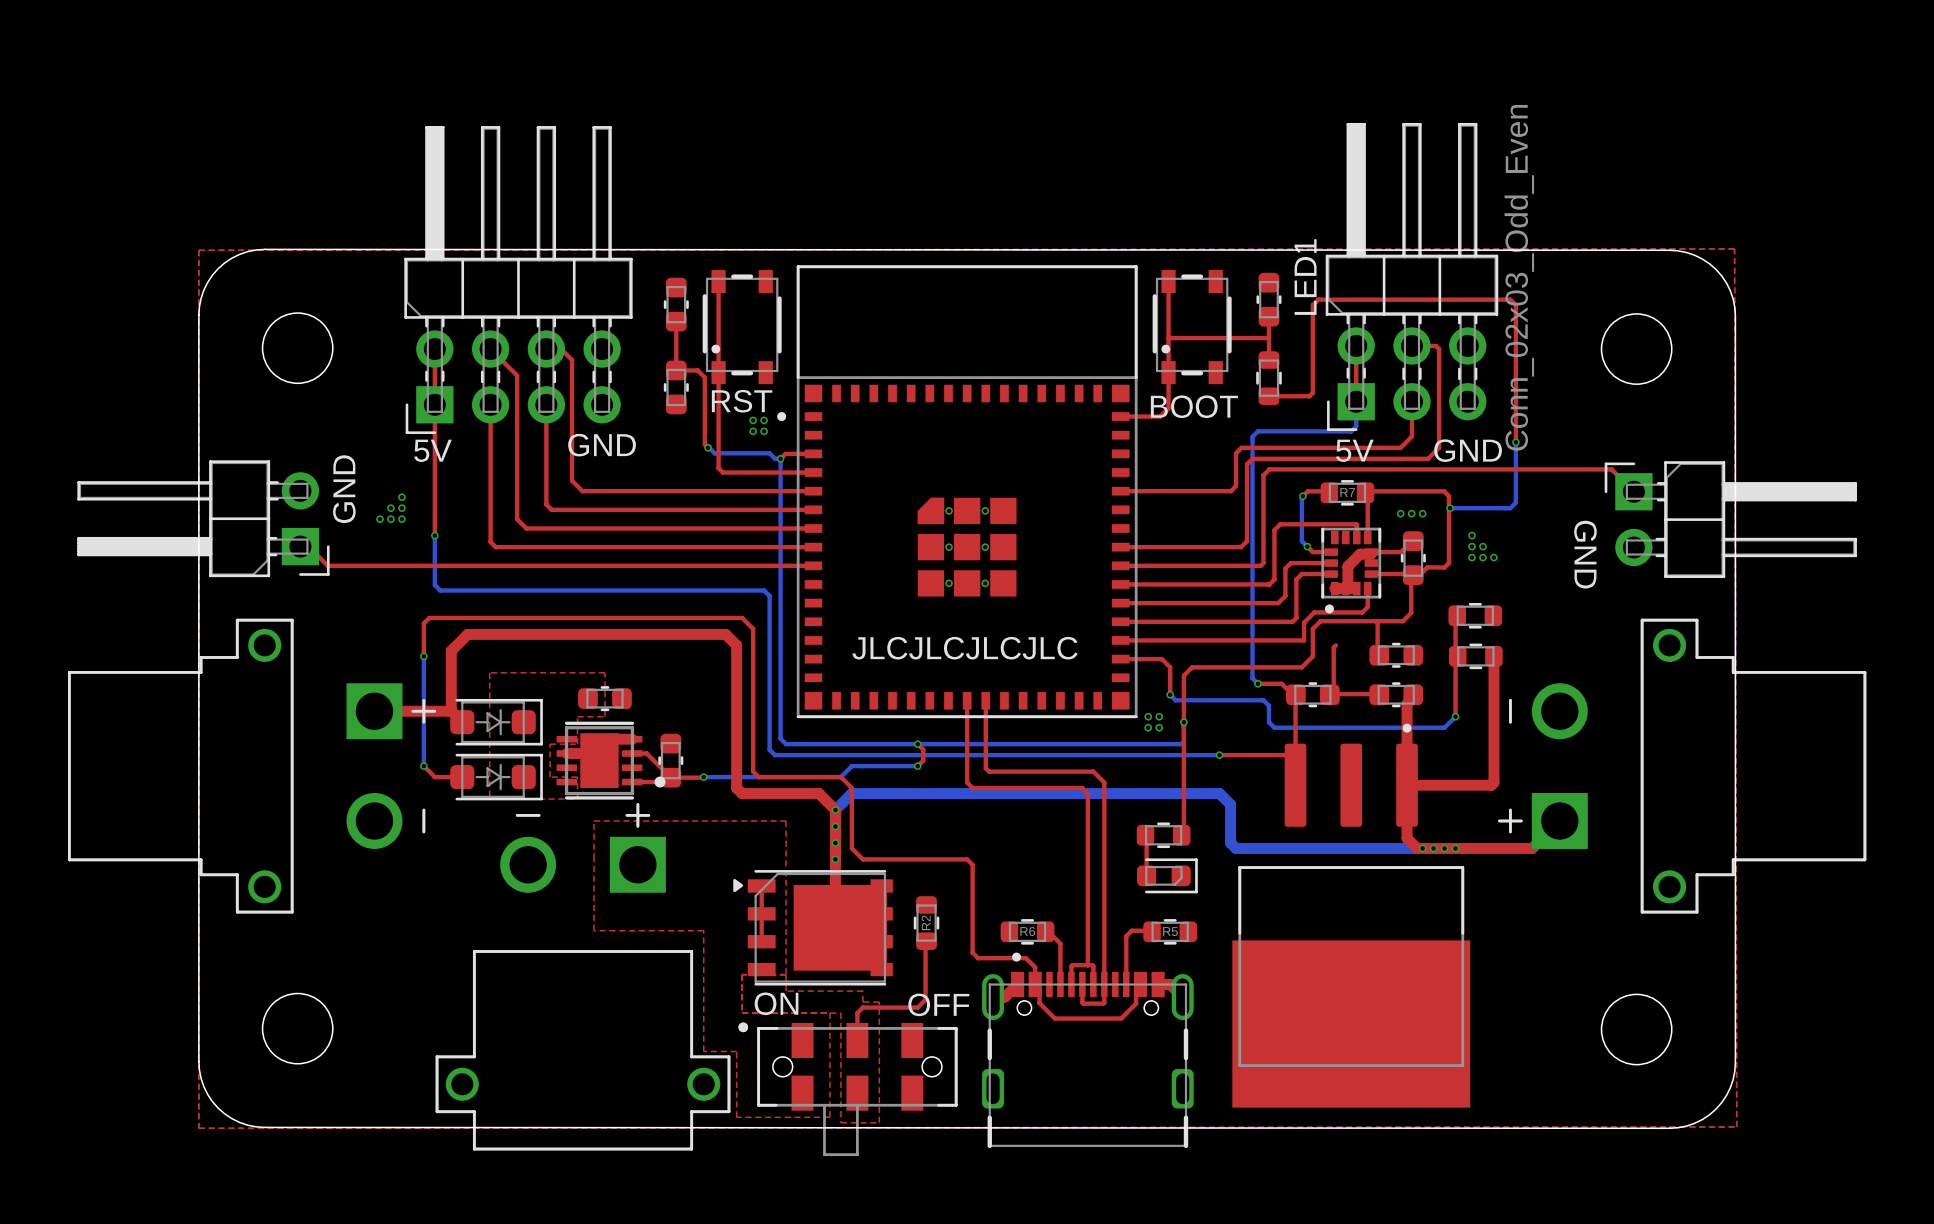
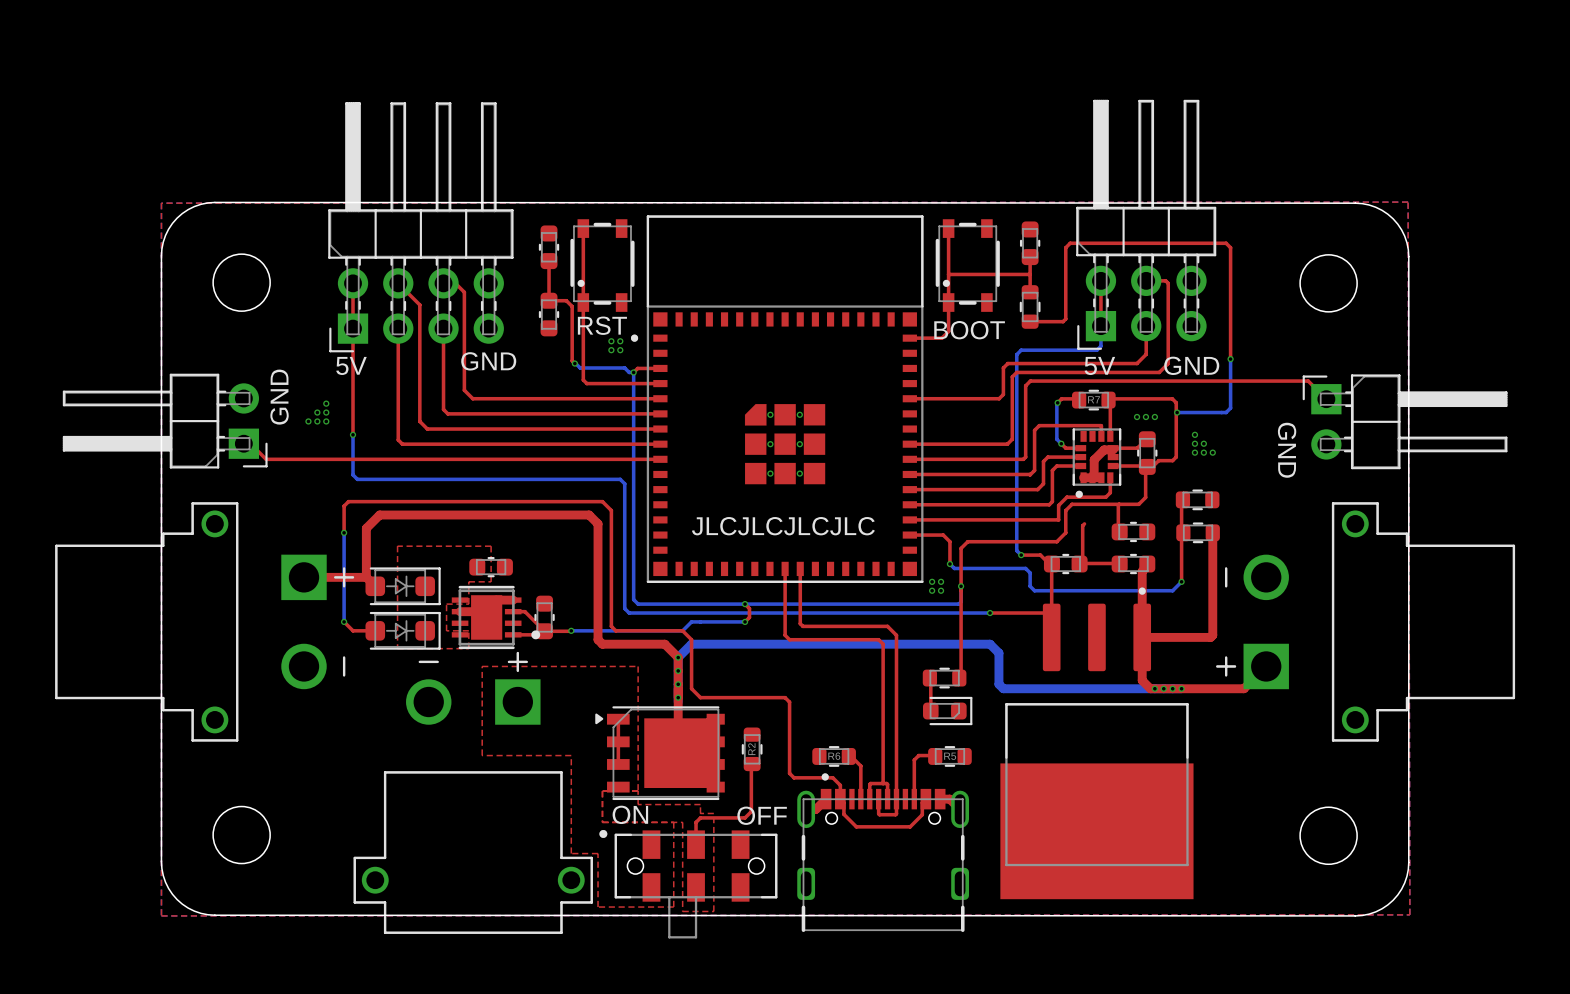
LED1 name: LED1 (1305, 277) -> none
LED1 value: Conn_02x03_Odd_Even (1519, 277) -> none

